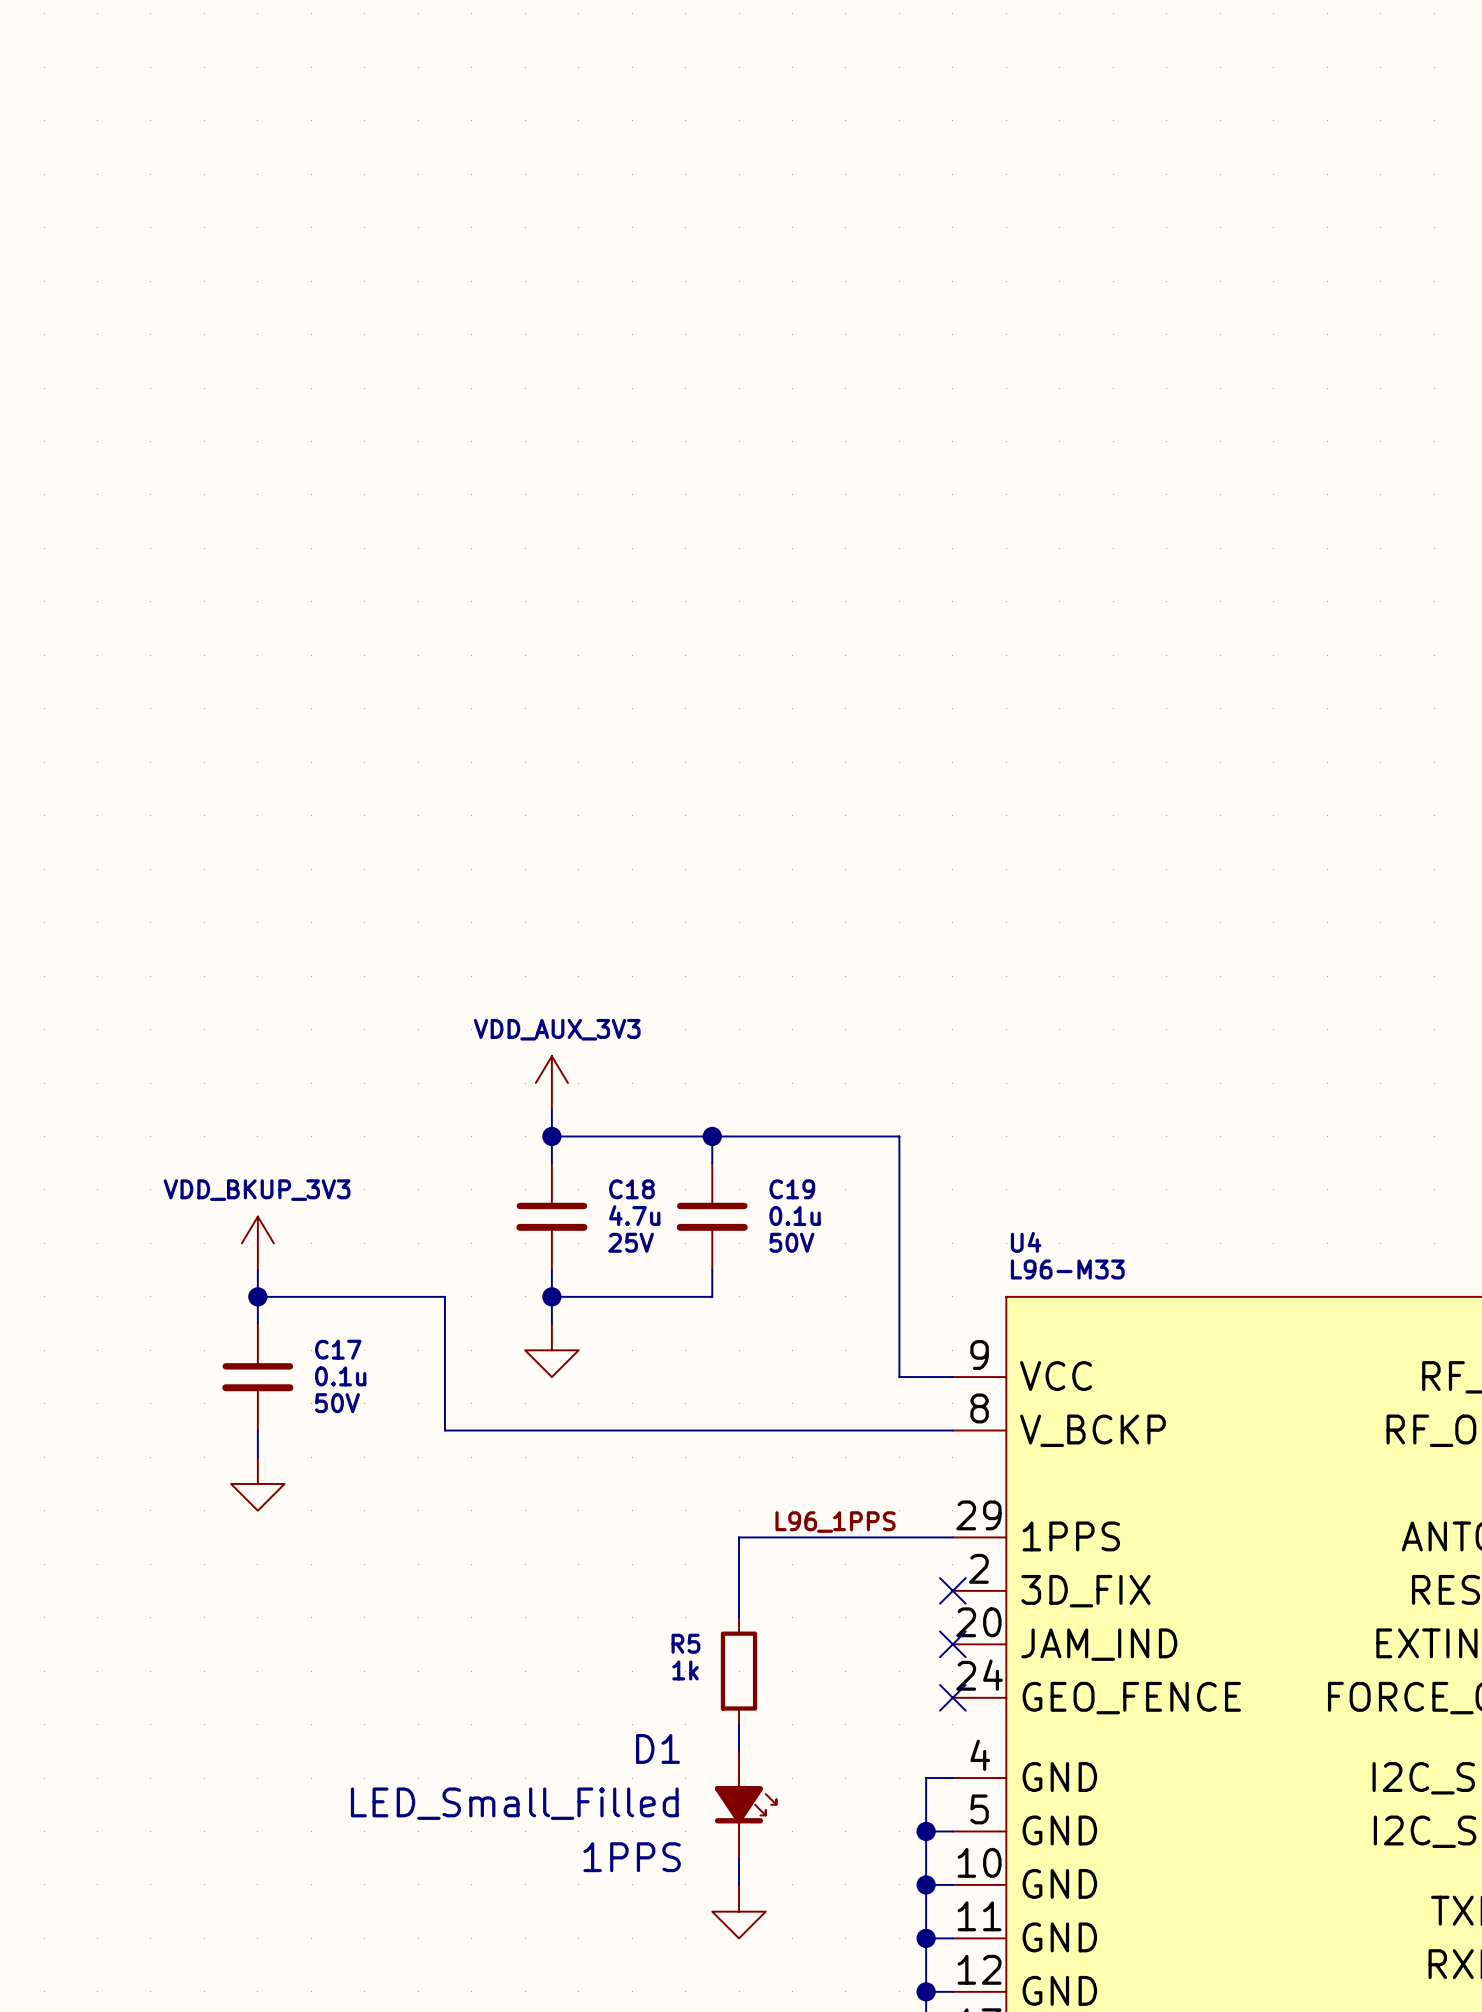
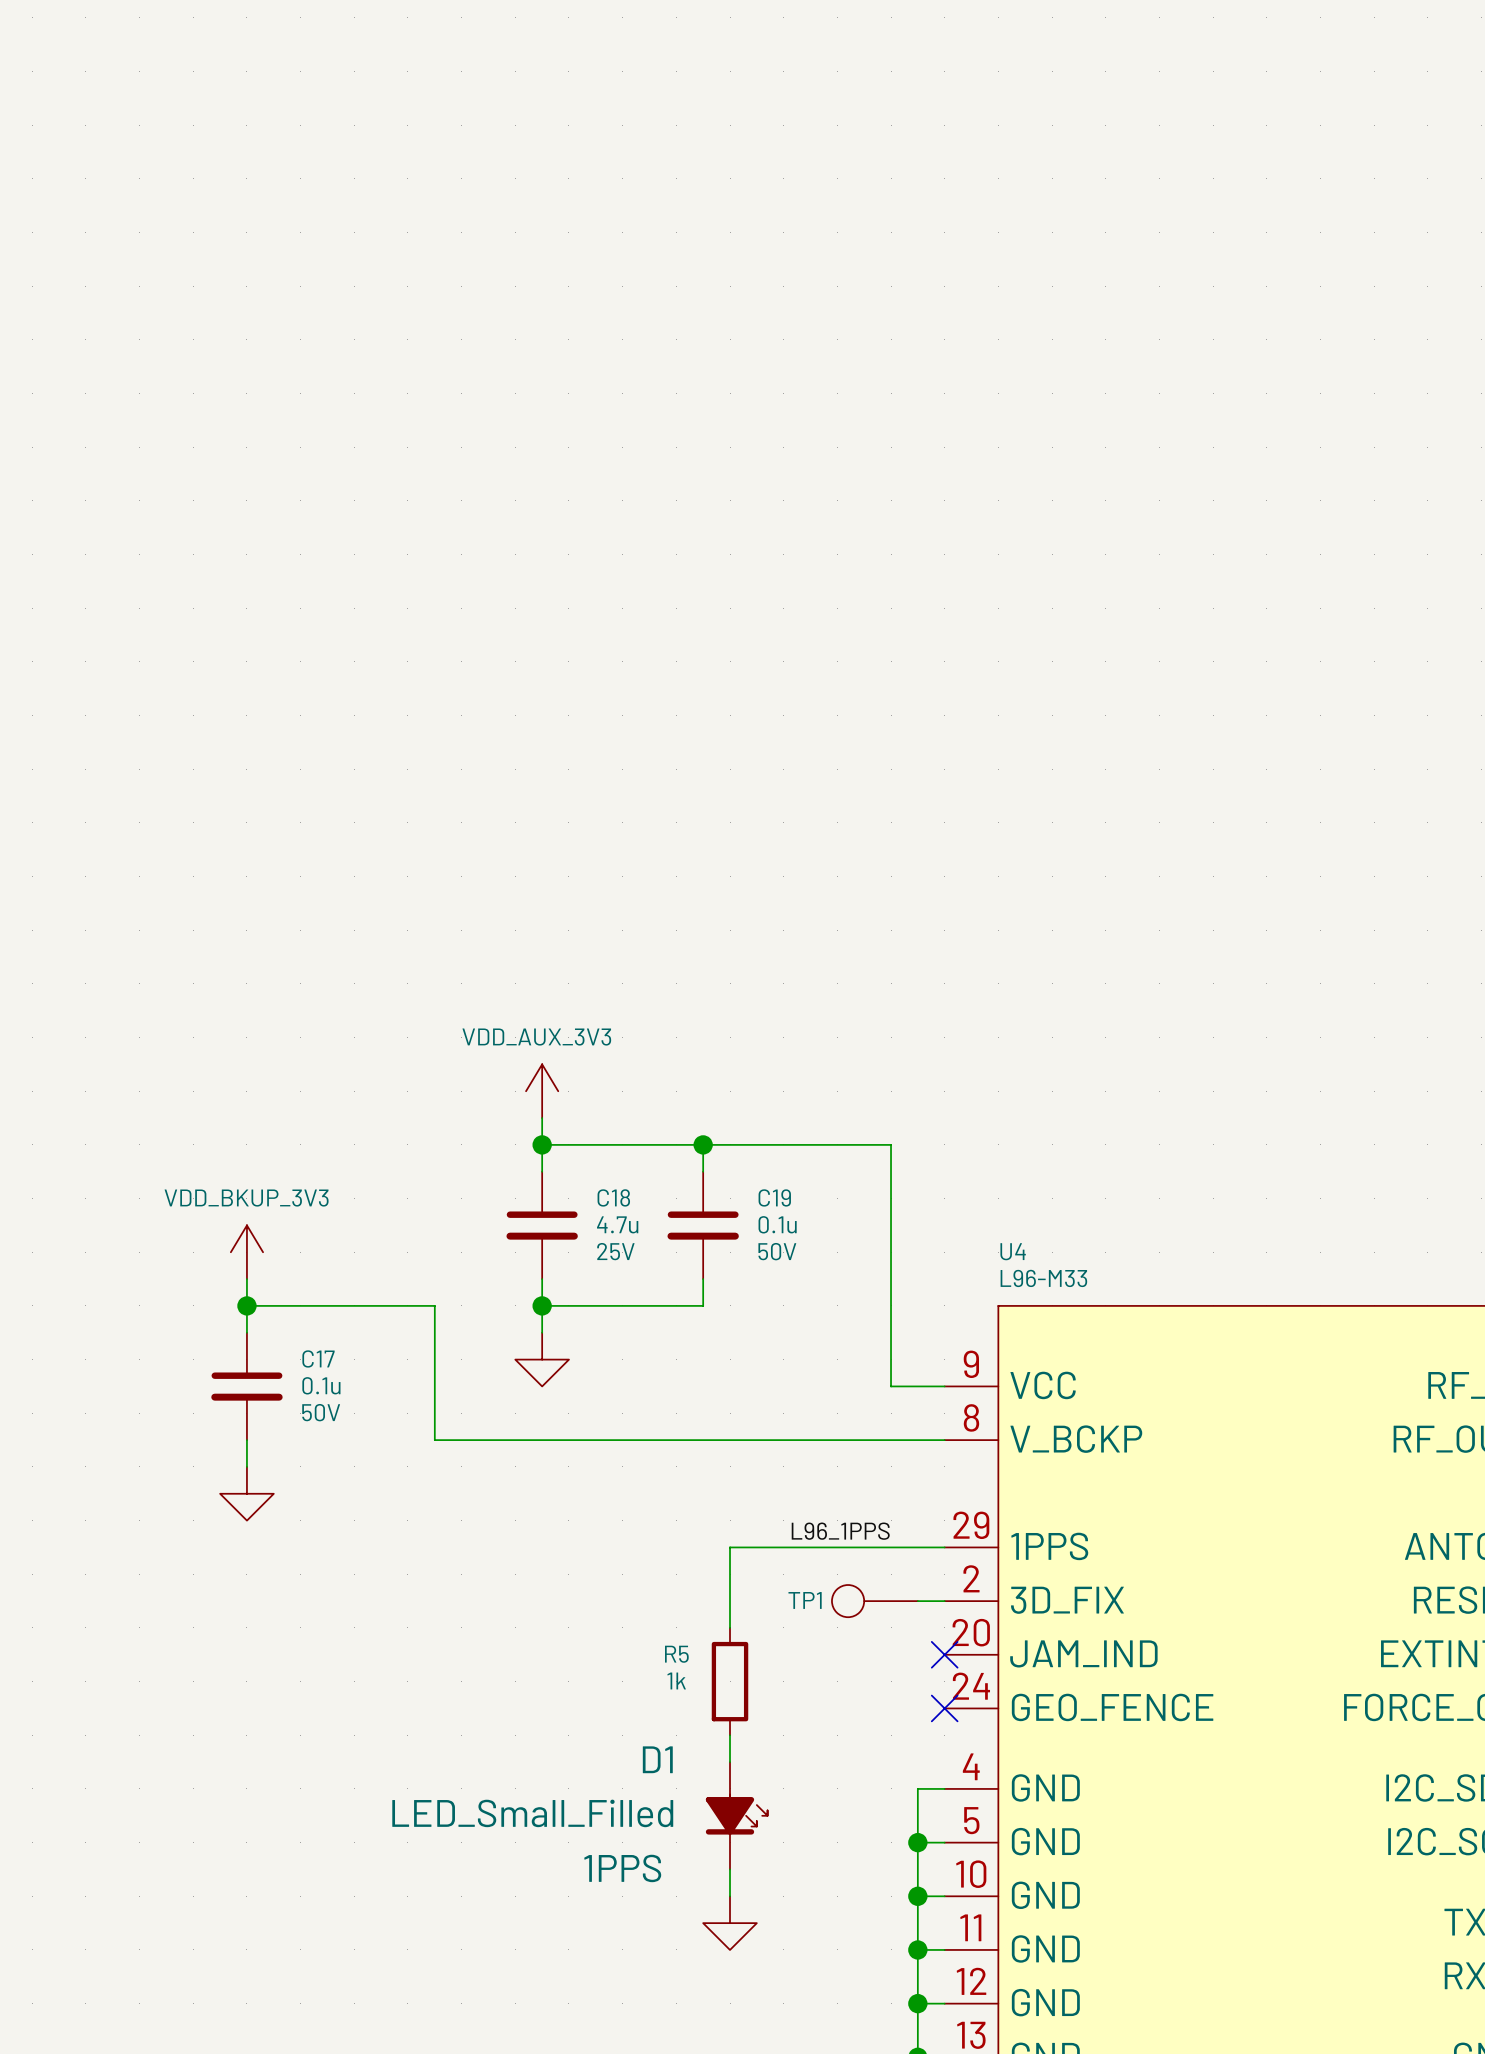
TP1: none -> (874, 1601)
wire: none -> (917, 1601) (944, 1601)
no-connect mark: (952, 1590) -> none

